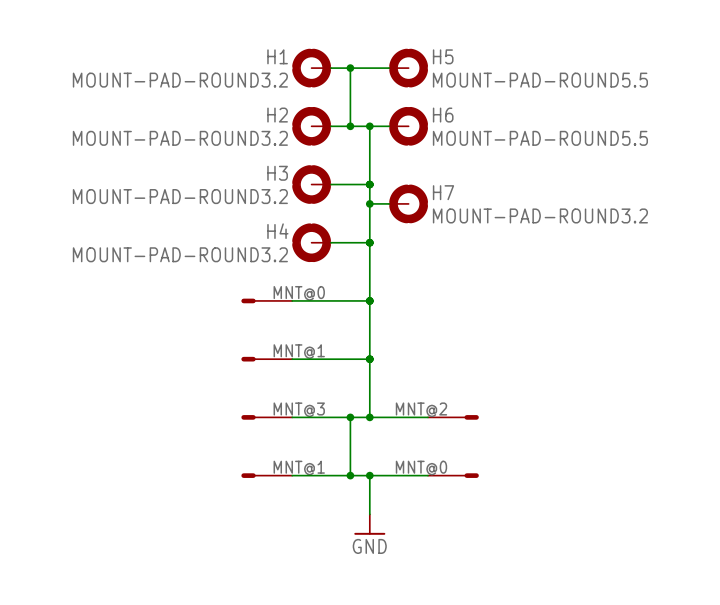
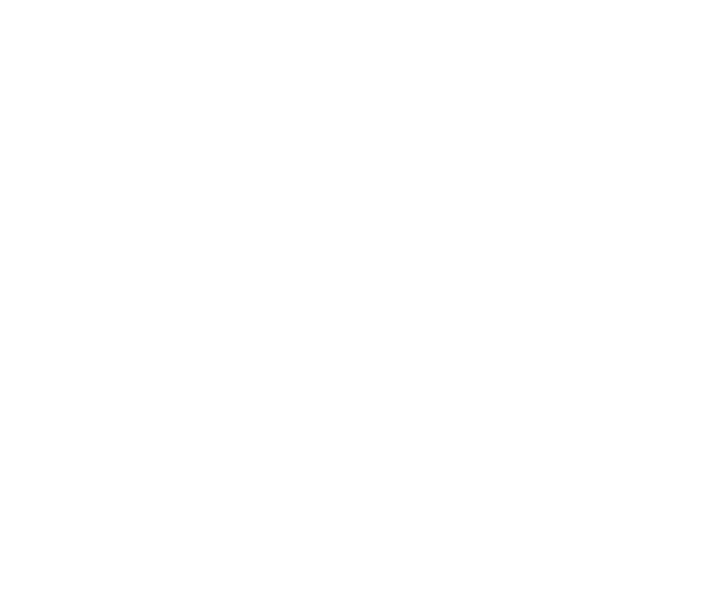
H1: MOUNT-PAD-ROUND3.2 (311, 68) -> none
wire: (330, 68) (389, 68) -> none
wire: (350, 68) (350, 126) -> none
junction: (350, 68) -> none
H5: MOUNT-PAD-ROUND5.5 (408, 68) -> none
H2: MOUNT-PAD-ROUND3.2 (311, 126) -> none
wire: (330, 126) (389, 126) -> none
junction: (350, 126) -> none
wire: (369, 126) (369, 417) -> none
junction: (369, 126) -> none
H6: MOUNT-PAD-ROUND5.5 (408, 126) -> none
H3: MOUNT-PAD-ROUND3.2 (311, 184) -> none
wire: (330, 184) (369, 184) -> none
junction: (369, 184) -> none
wire: (369, 203) (389, 203) -> none
junction: (369, 203) -> none
H7: MOUNT-PAD-ROUND3.2 (408, 203) -> none
H4: MOUNT-PAD-ROUND3.2 (311, 242) -> none
wire: (330, 242) (369, 242) -> none
junction: (369, 242) -> none
part: (266, 300) -> none
wire: (292, 300) (369, 300) -> none
junction: (369, 300) -> none
part: (266, 359) -> none
wire: (292, 359) (369, 359) -> none
junction: (369, 359) -> none
part: (266, 417) -> none
wire: (292, 417) (428, 417) -> none
wire: (350, 417) (350, 475) -> none
junction: (350, 417) -> none
junction: (369, 417) -> none
part: (453, 417) -> none
part: (266, 475) -> none
wire: (292, 475) (428, 475) -> none
junction: (350, 475) -> none
wire: (369, 475) (369, 514) -> none
junction: (369, 475) -> none
part: (453, 475) -> none
power symbol: GND (369, 524) -> none

